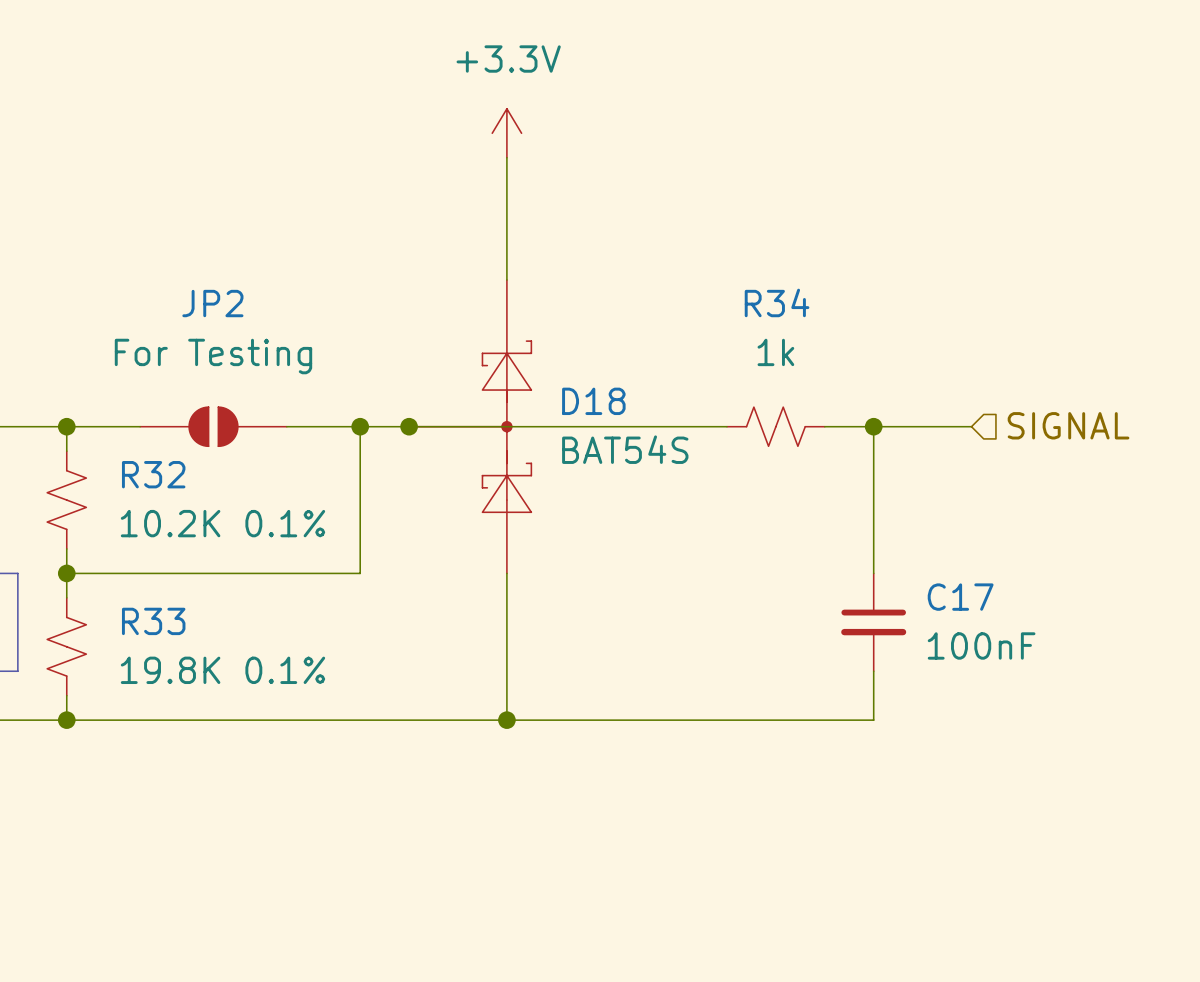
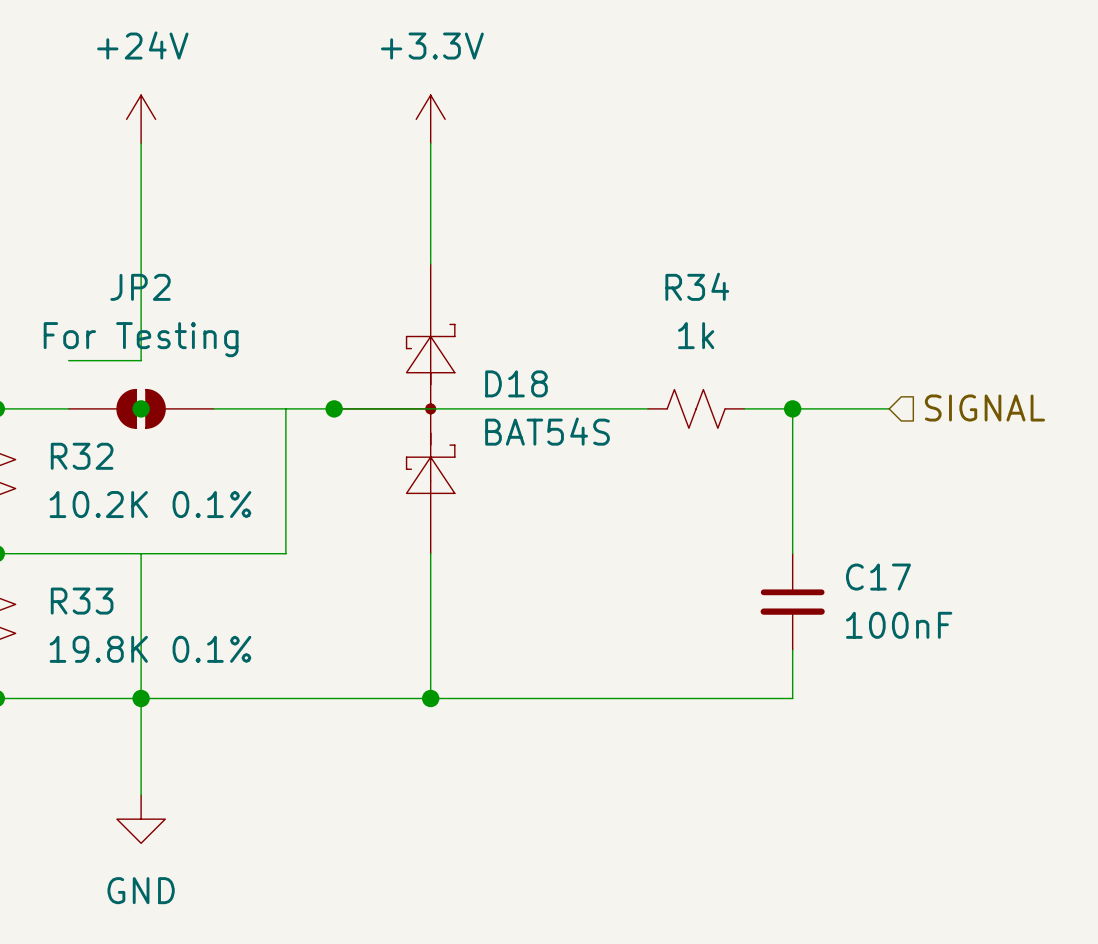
power symbol: none -> +24V (141, 119)
wire: none -> (141, 143) (141, 360) (68, 360)
junction: none -> (141, 408)
junction: (360, 426) -> none
wire: none -> (141, 553) (141, 795)
junction: none -> (141, 698)
power symbol: none -> GND (141, 819)

